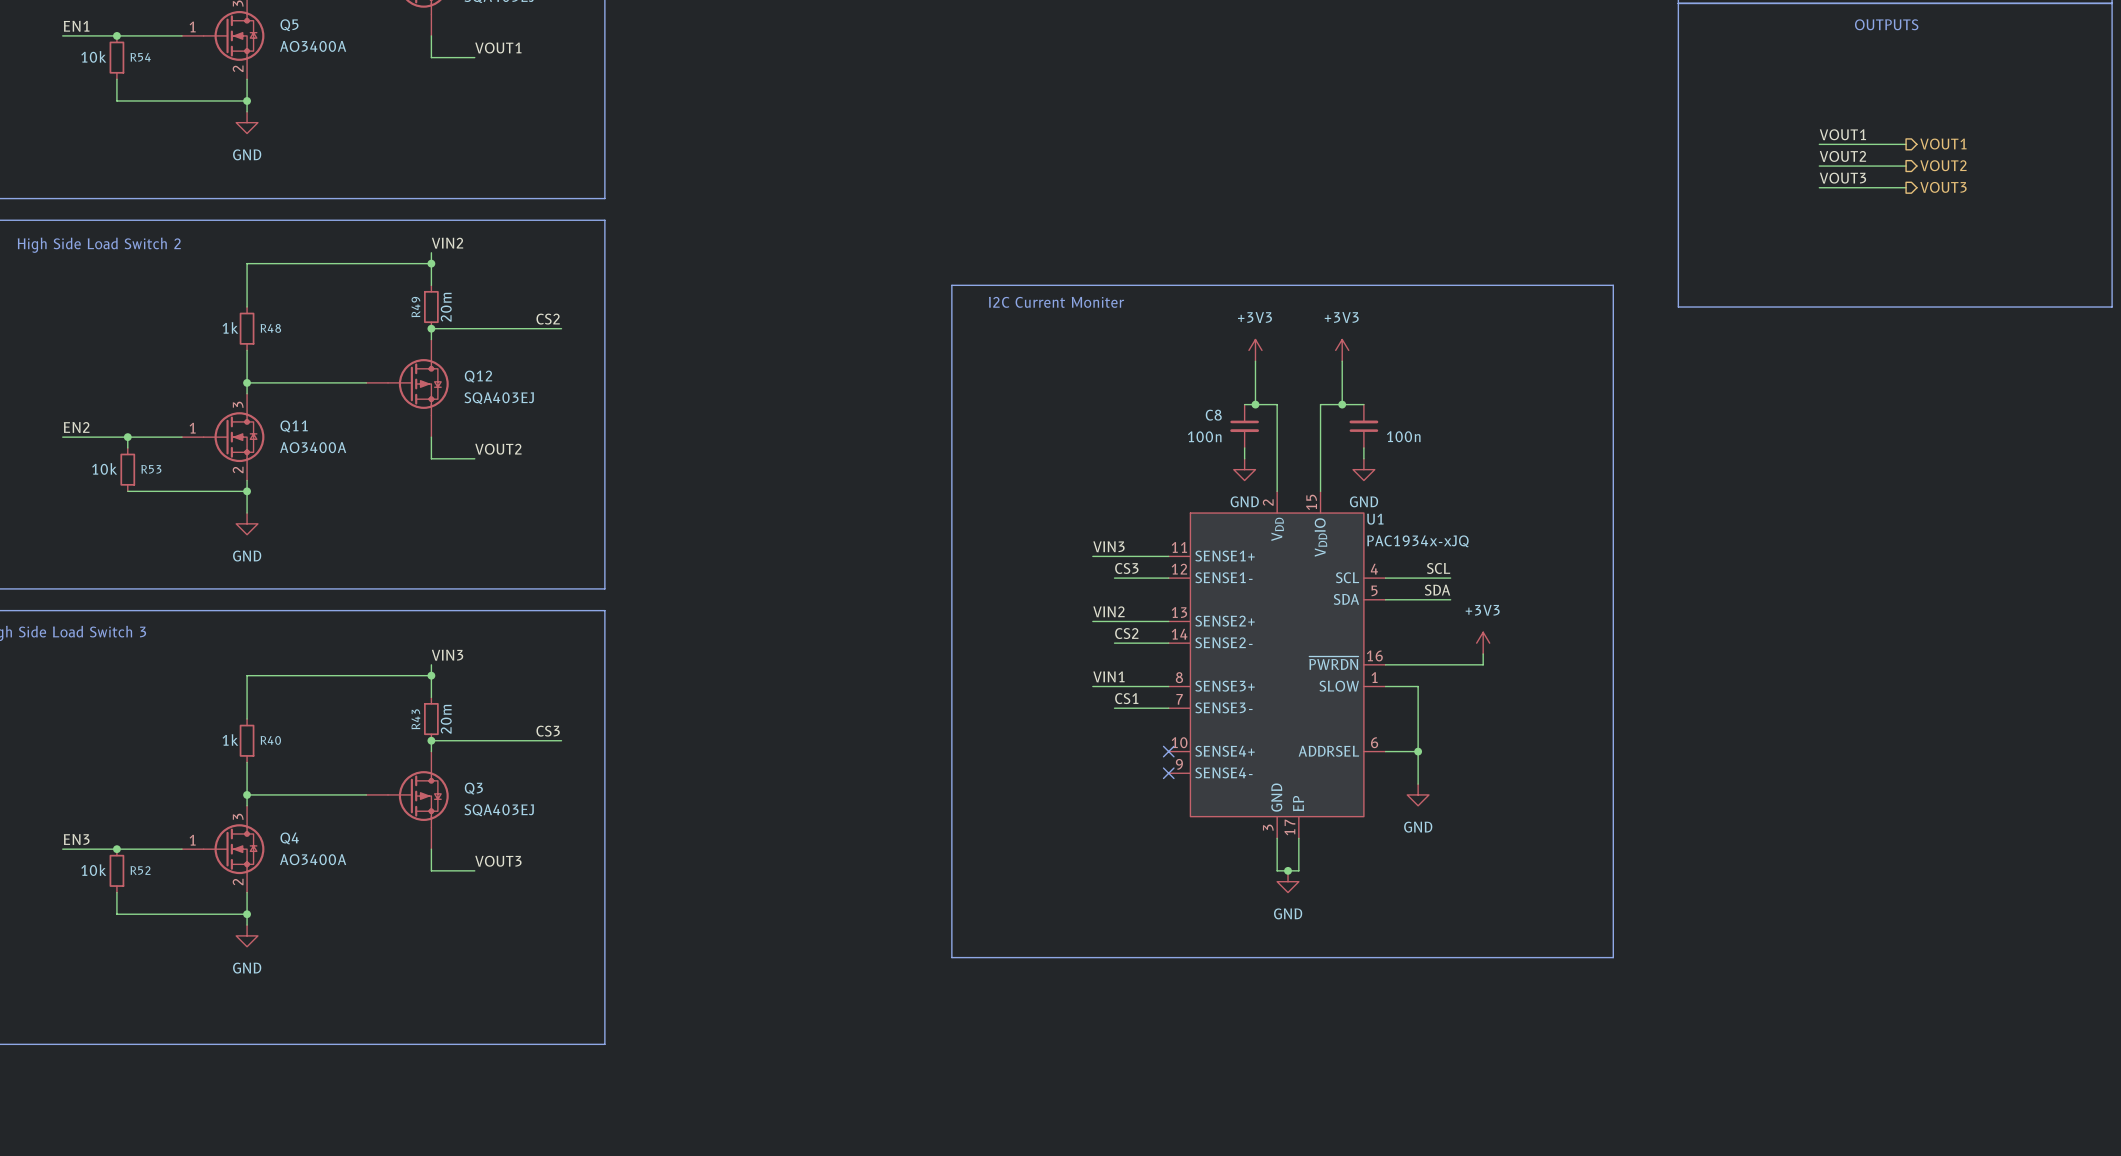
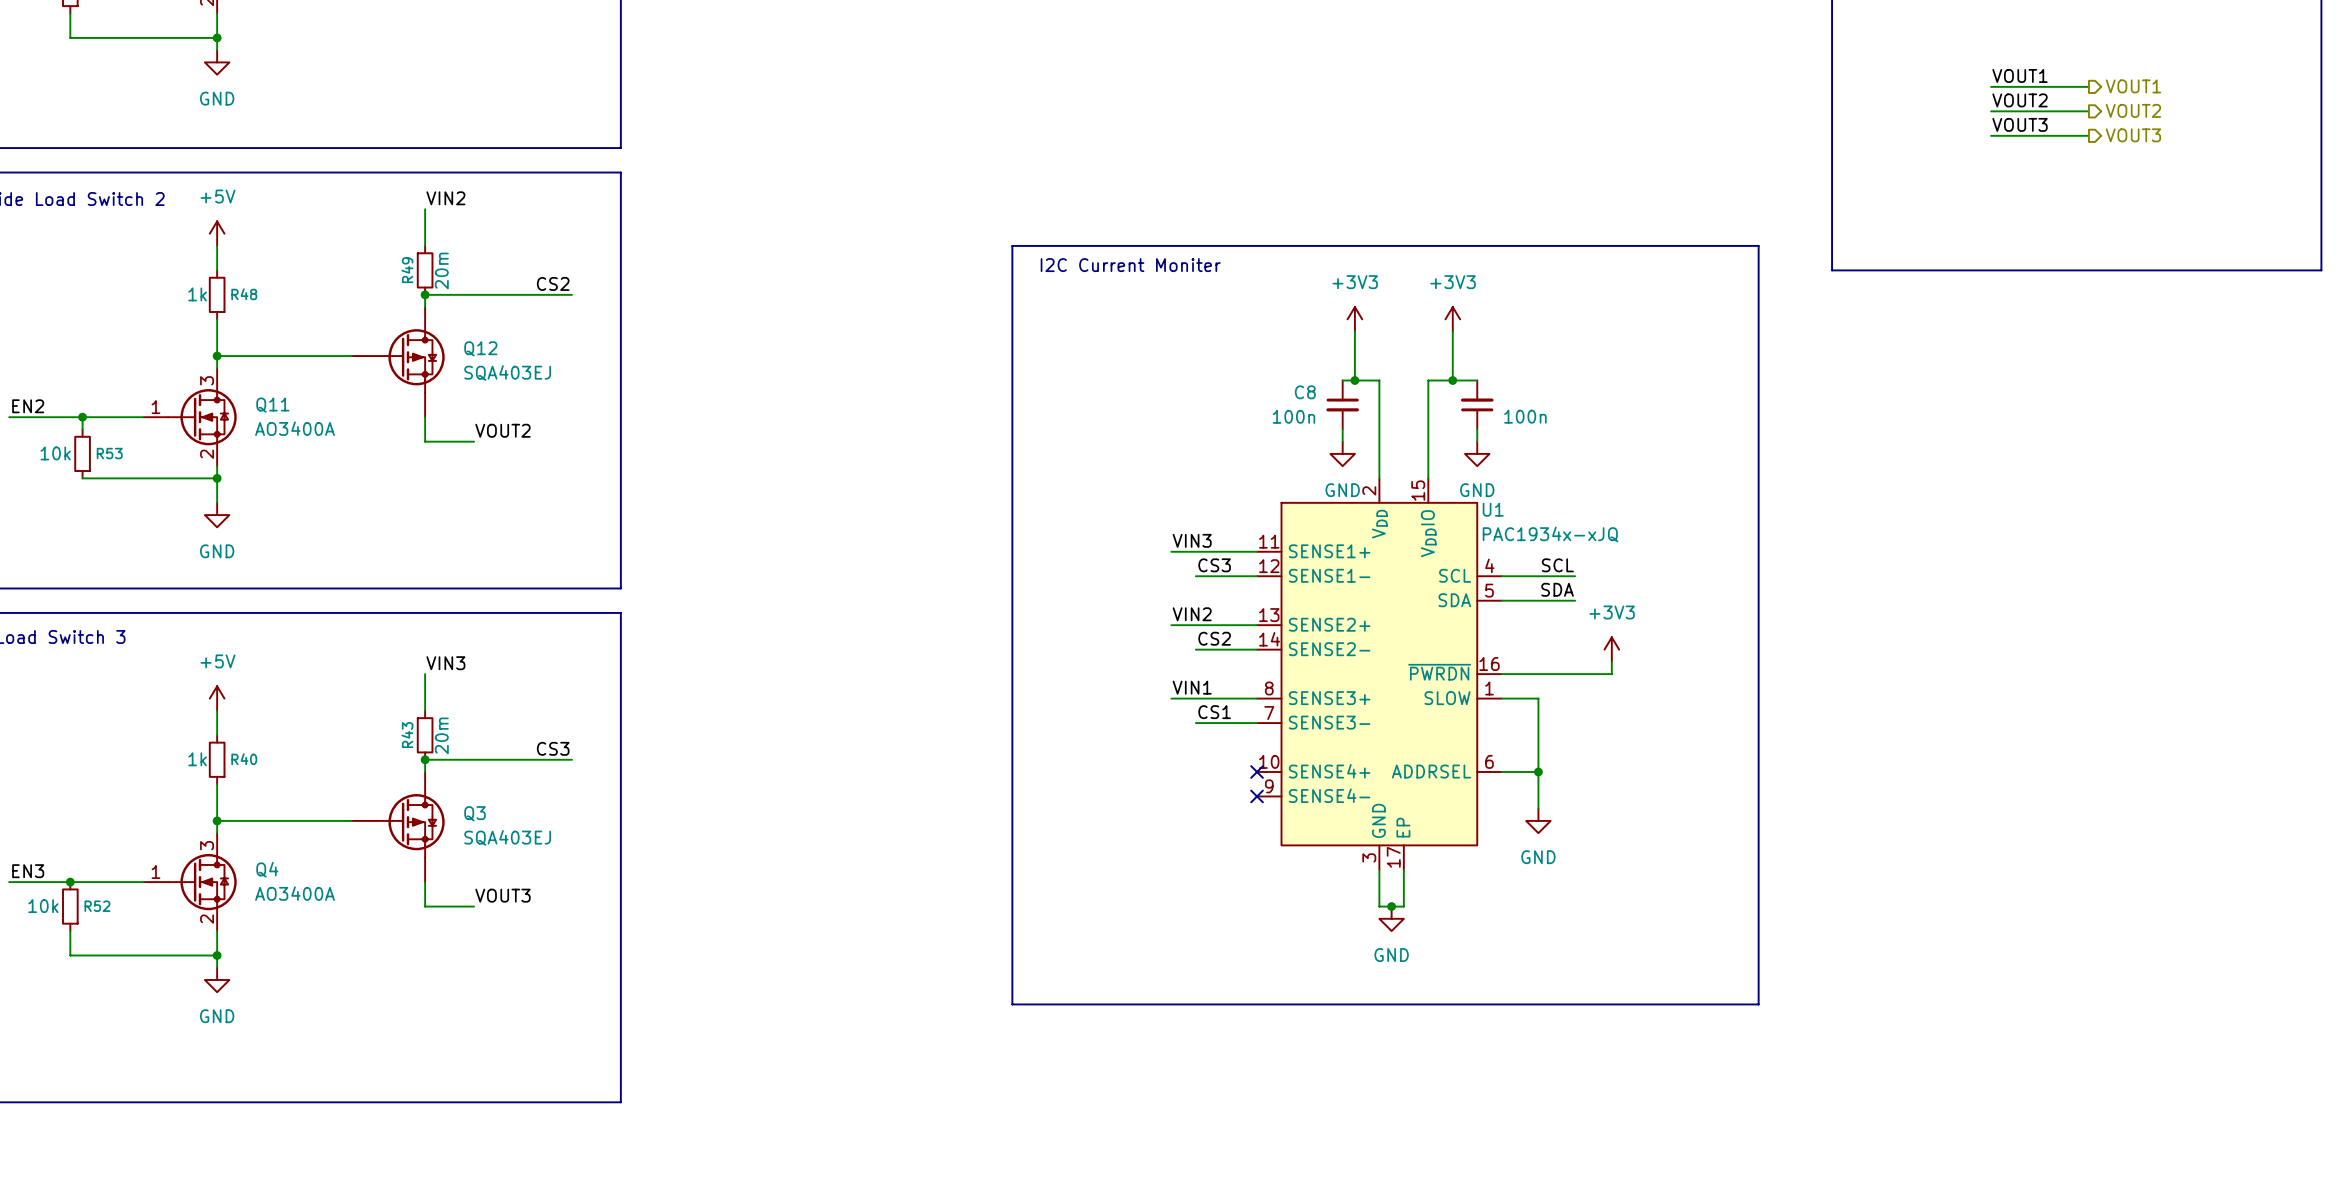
wire: (431, 263) (247, 263) (247, 285) -> none
junction: (431, 263) -> none
power symbol: none -> +5V (217, 233)
wire: (431, 675) (247, 675) (247, 697) -> none
junction: (431, 675) -> none
power symbol: none -> +5V (217, 698)

